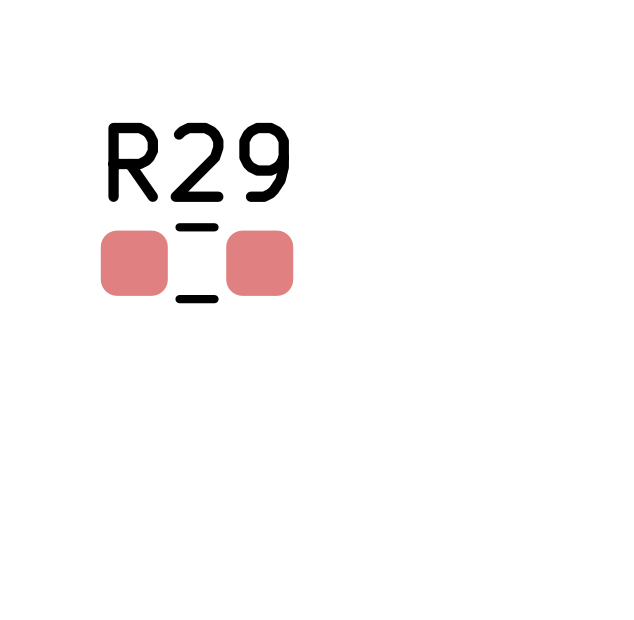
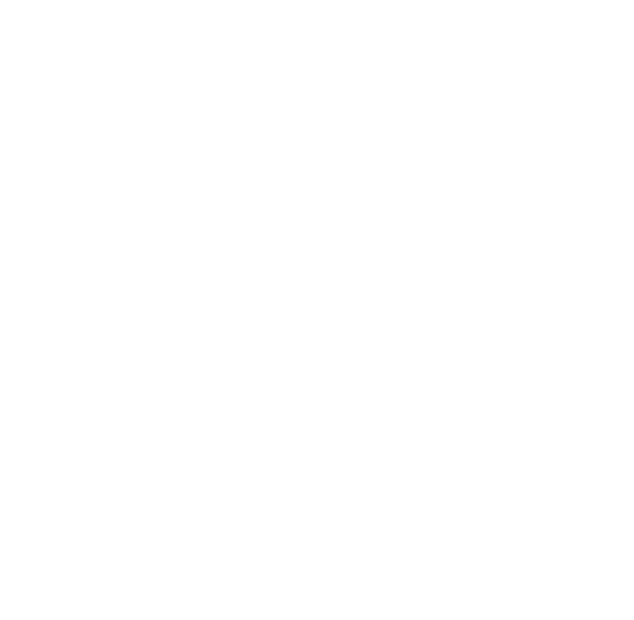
R29: (197, 263) -> none

